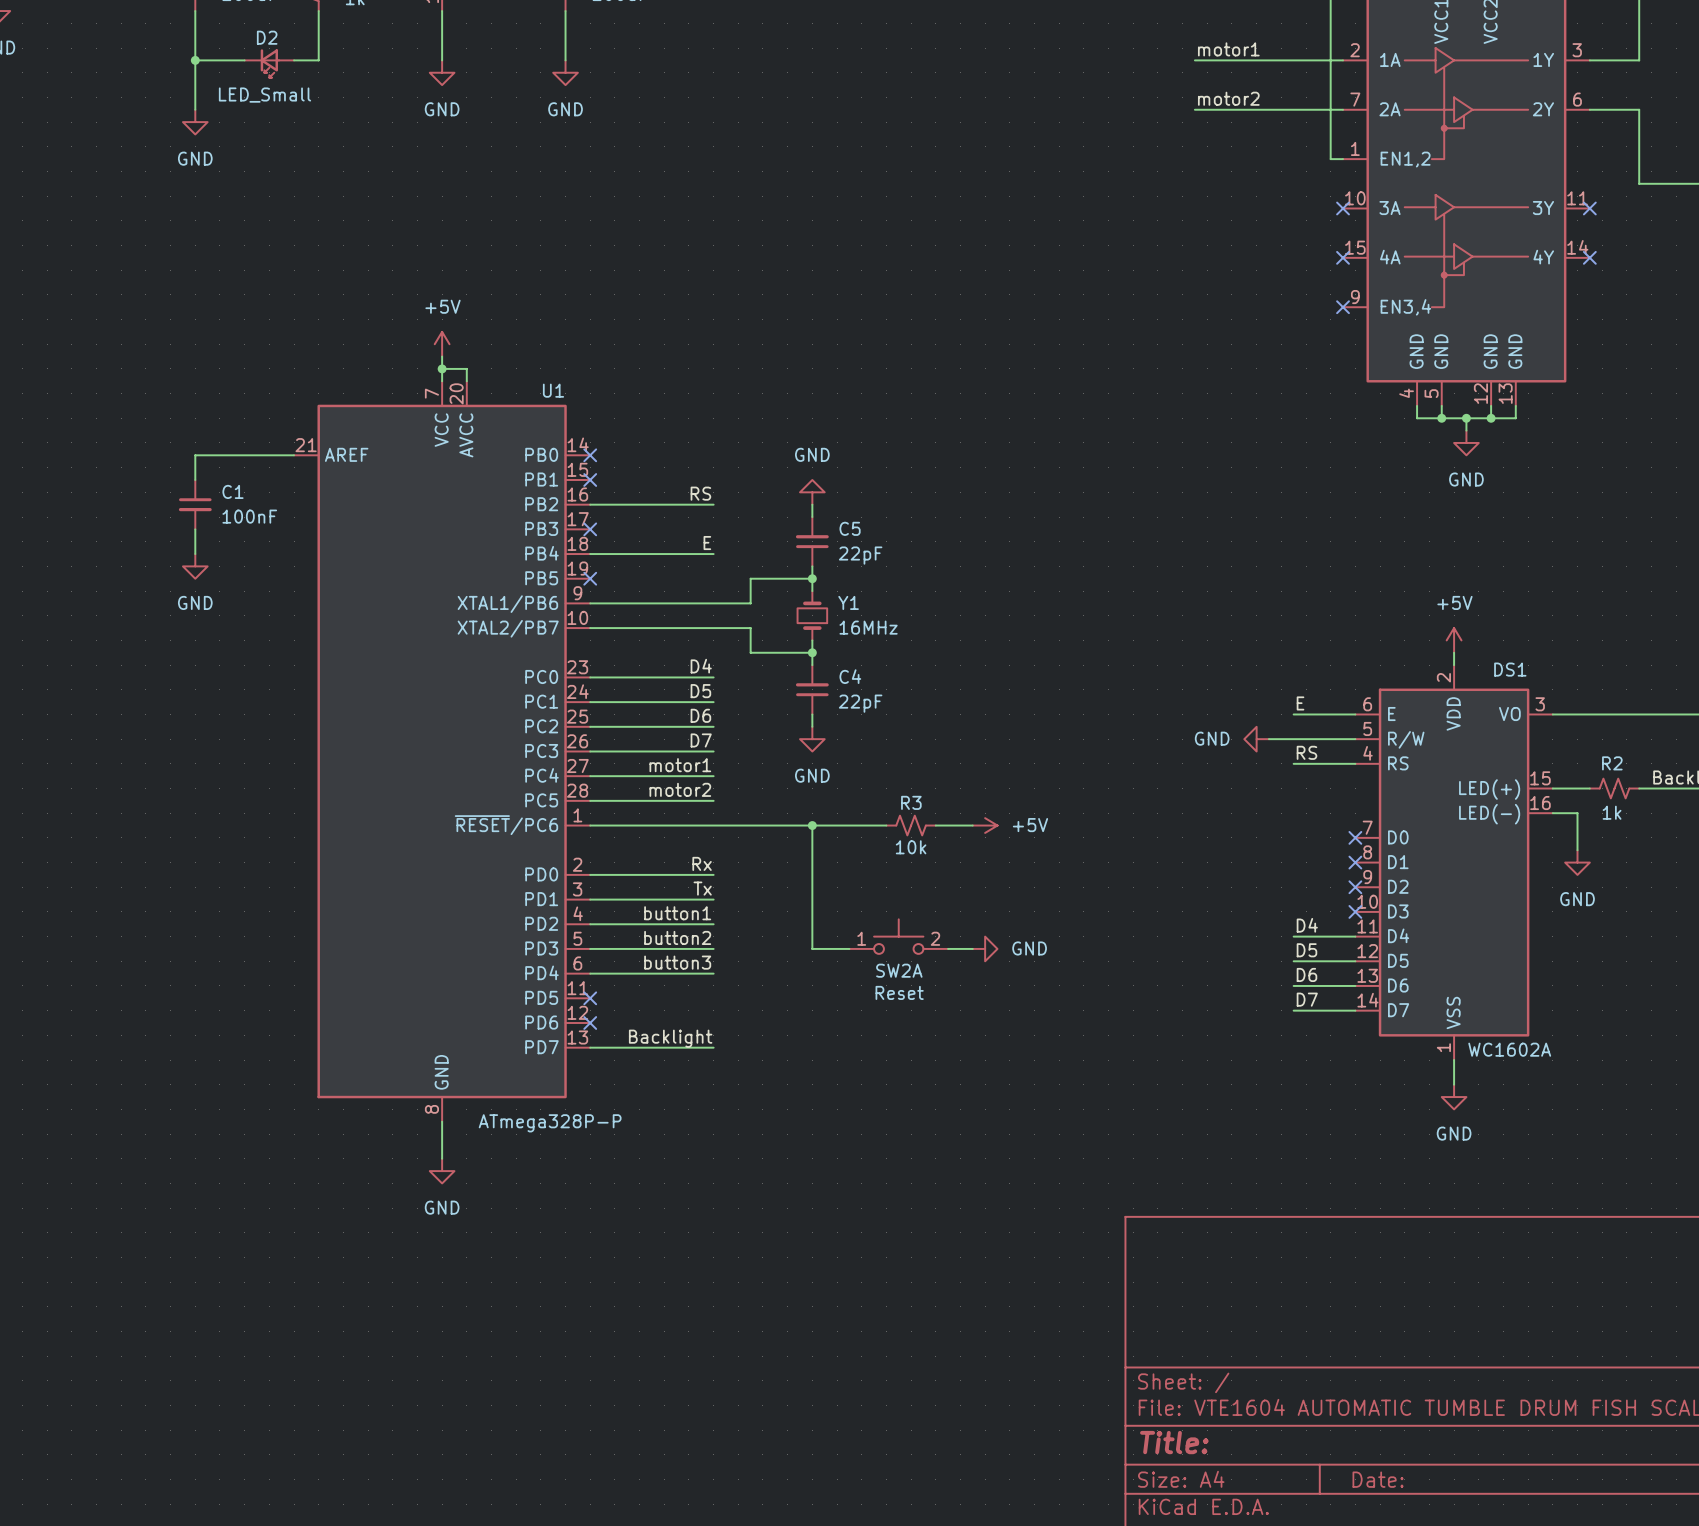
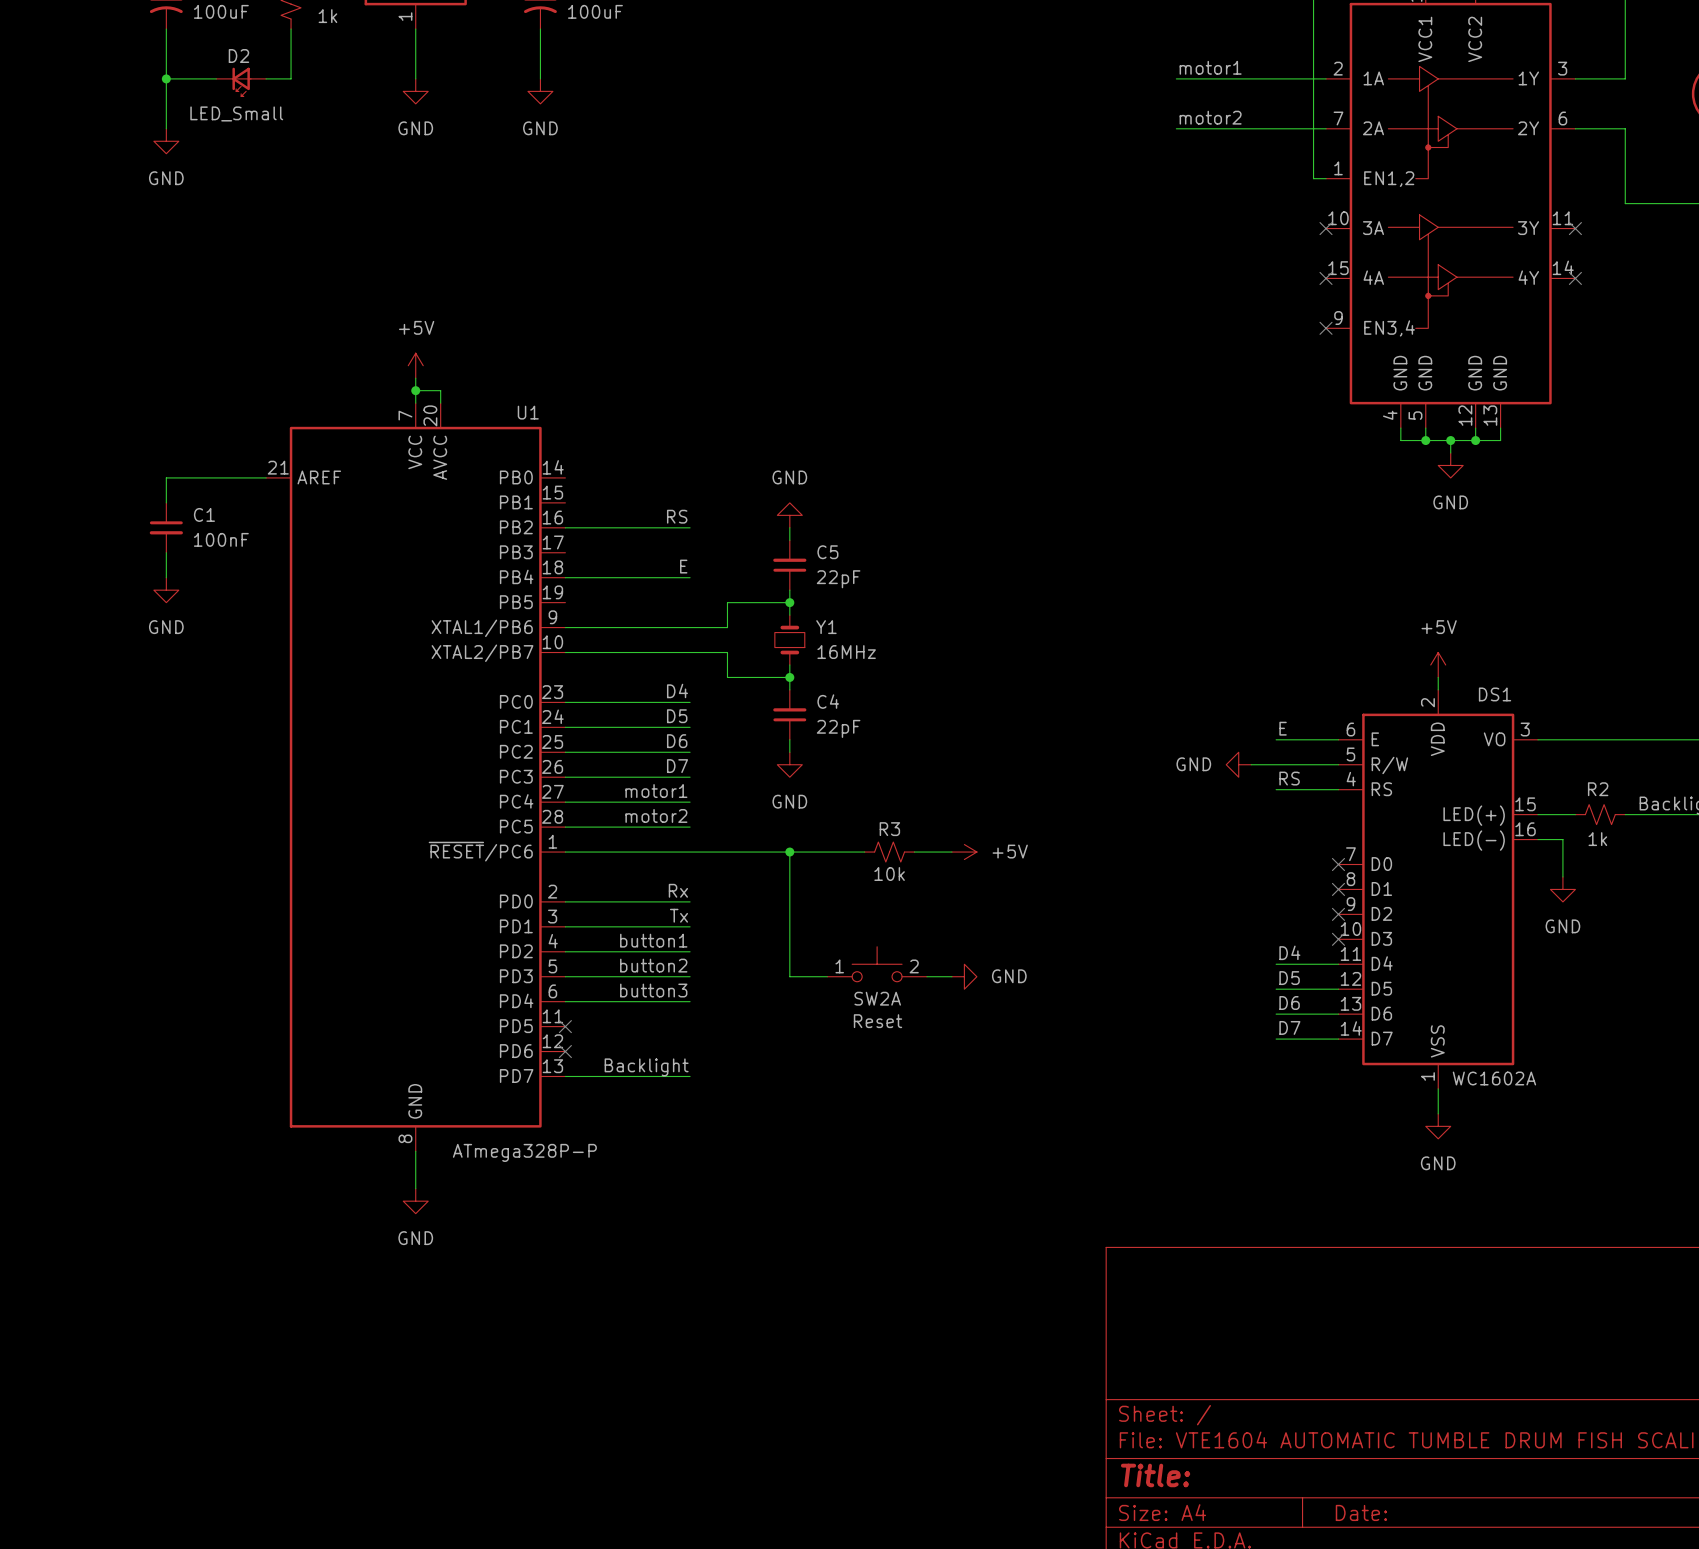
no-connect mark: (590, 455) -> none
no-connect mark: (590, 479) -> none
no-connect mark: (590, 529) -> none
no-connect mark: (590, 578) -> none

